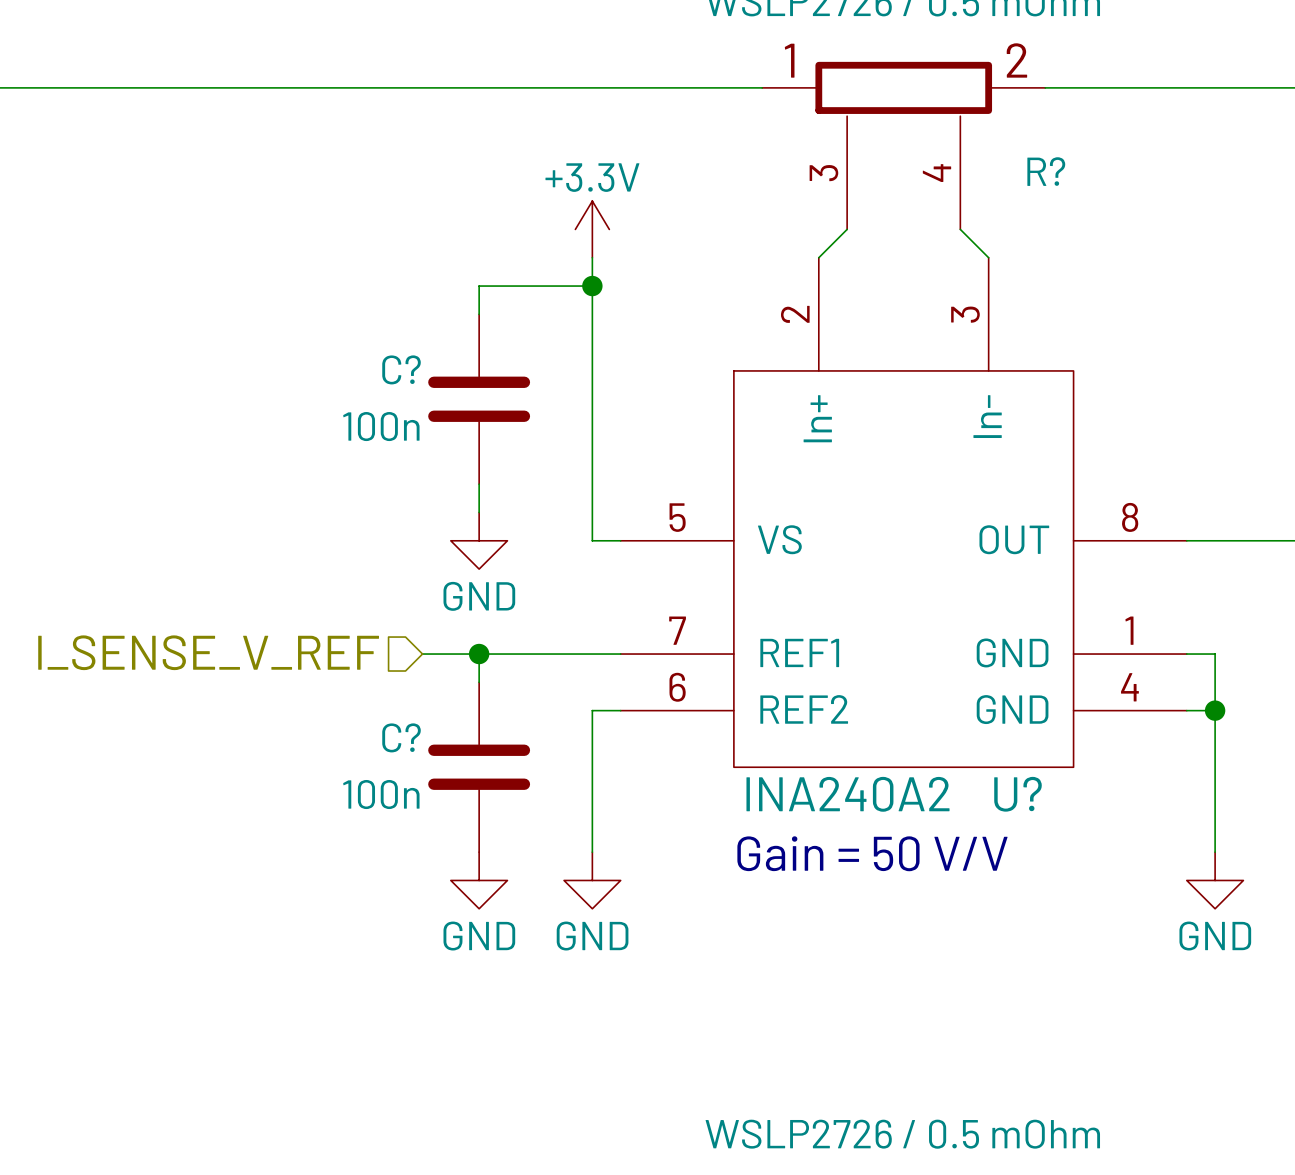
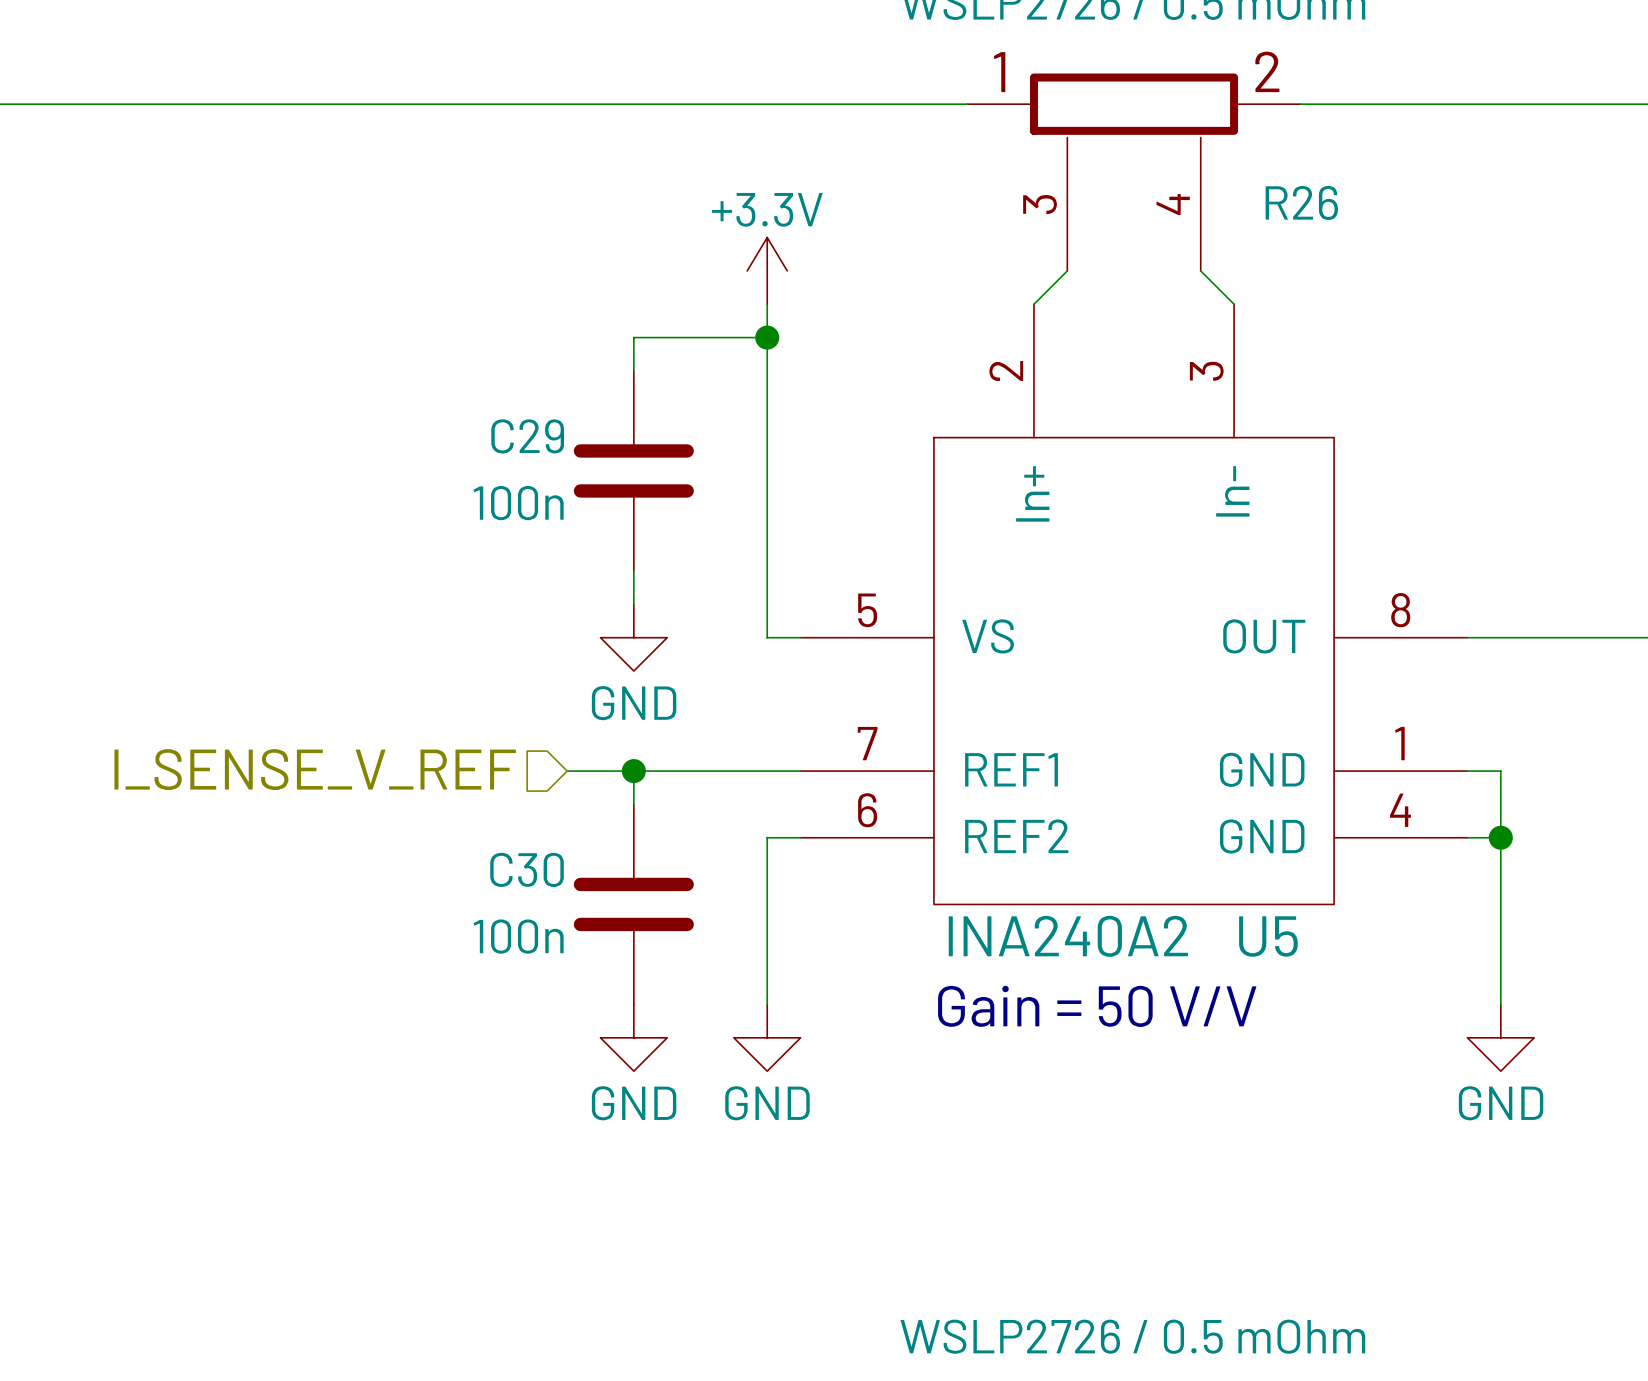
R? name: R? (1046, 171) -> R26 (1301, 202)
C? name: C? (401, 369) -> C29 (527, 436)
C? name: C? (401, 737) -> C30 (527, 869)
U? name: U? (1017, 794) -> U5 (1268, 936)

